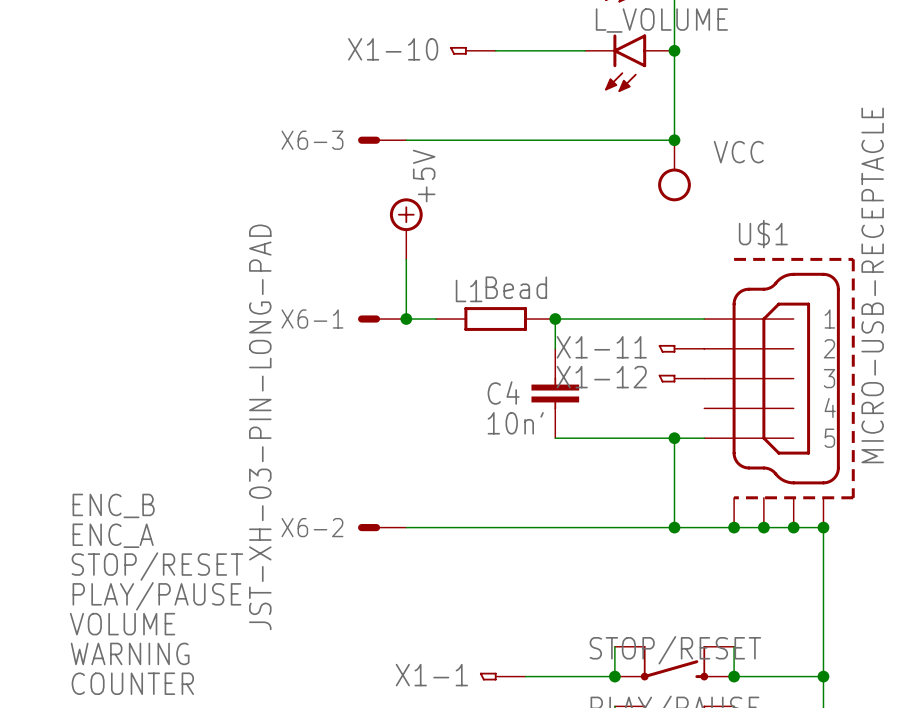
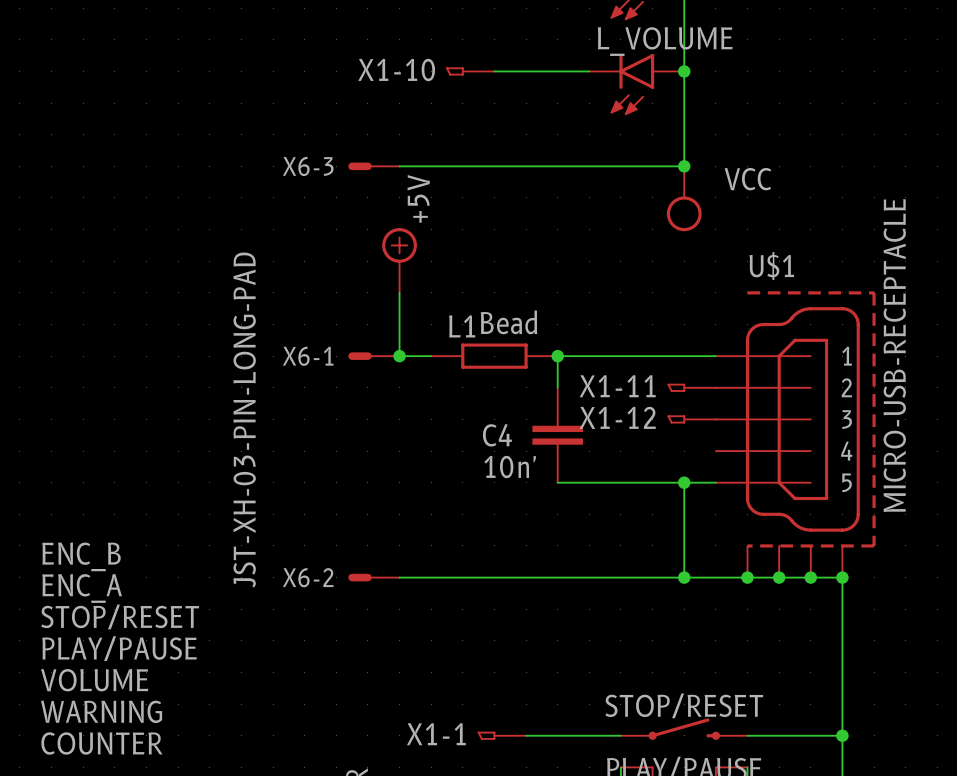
STOP/RESET symbol: [614, 645, 735, 681] -> [620, 718, 748, 740]
wire: (614, 646) (614, 676) -> none
wire: (734, 646) (734, 676) -> none
junction: (614, 676) -> none
junction: (734, 676) -> none

